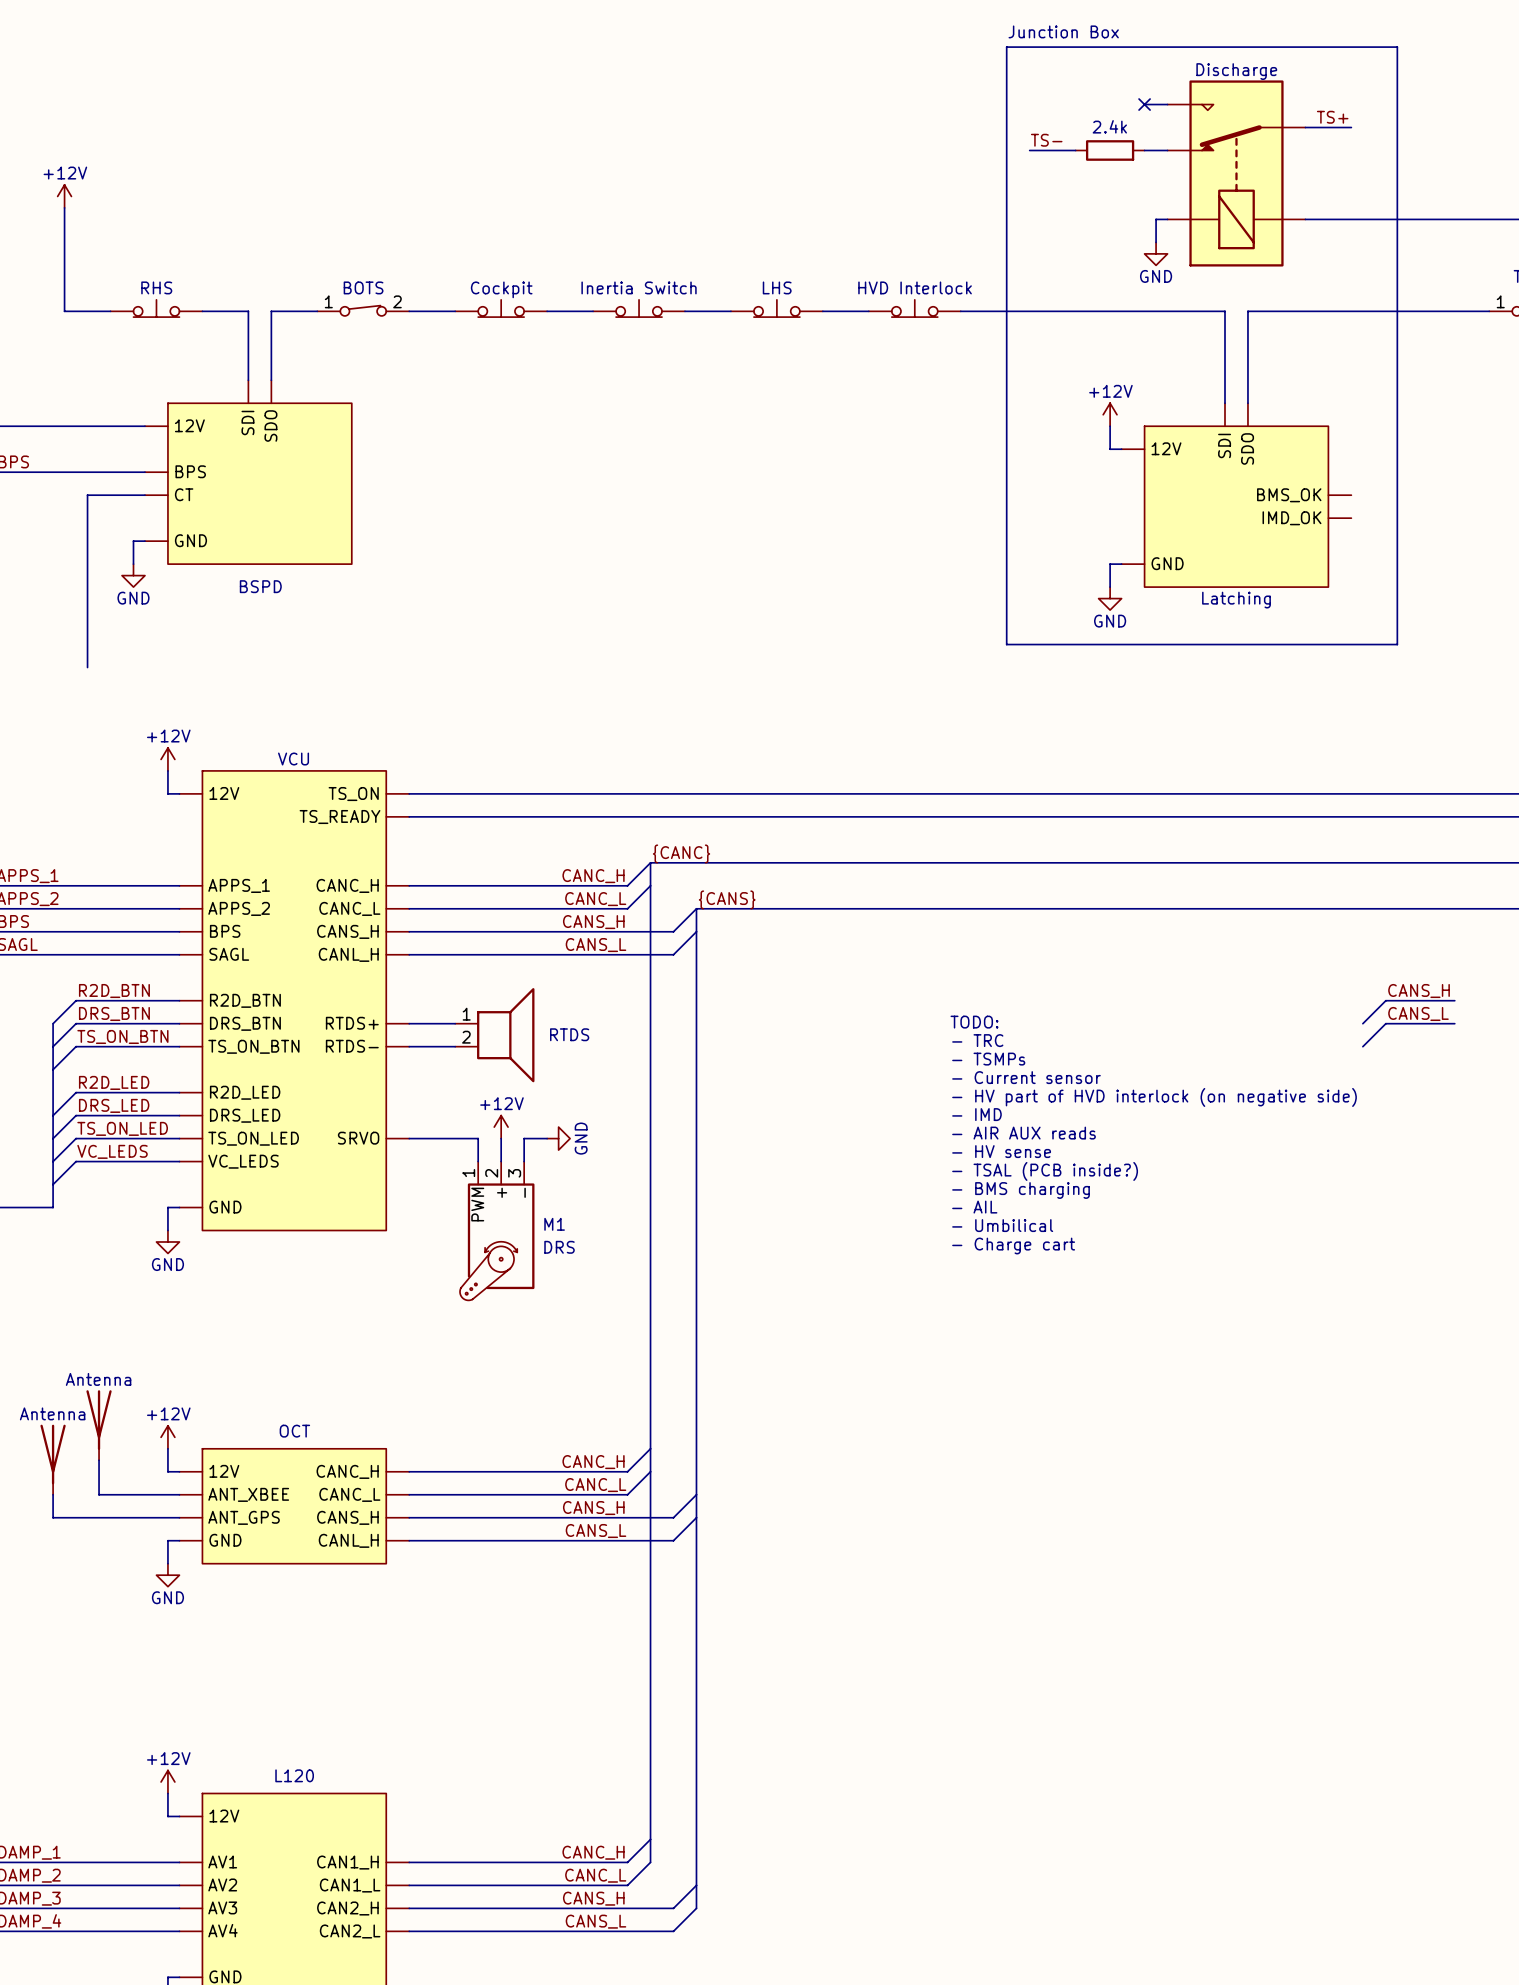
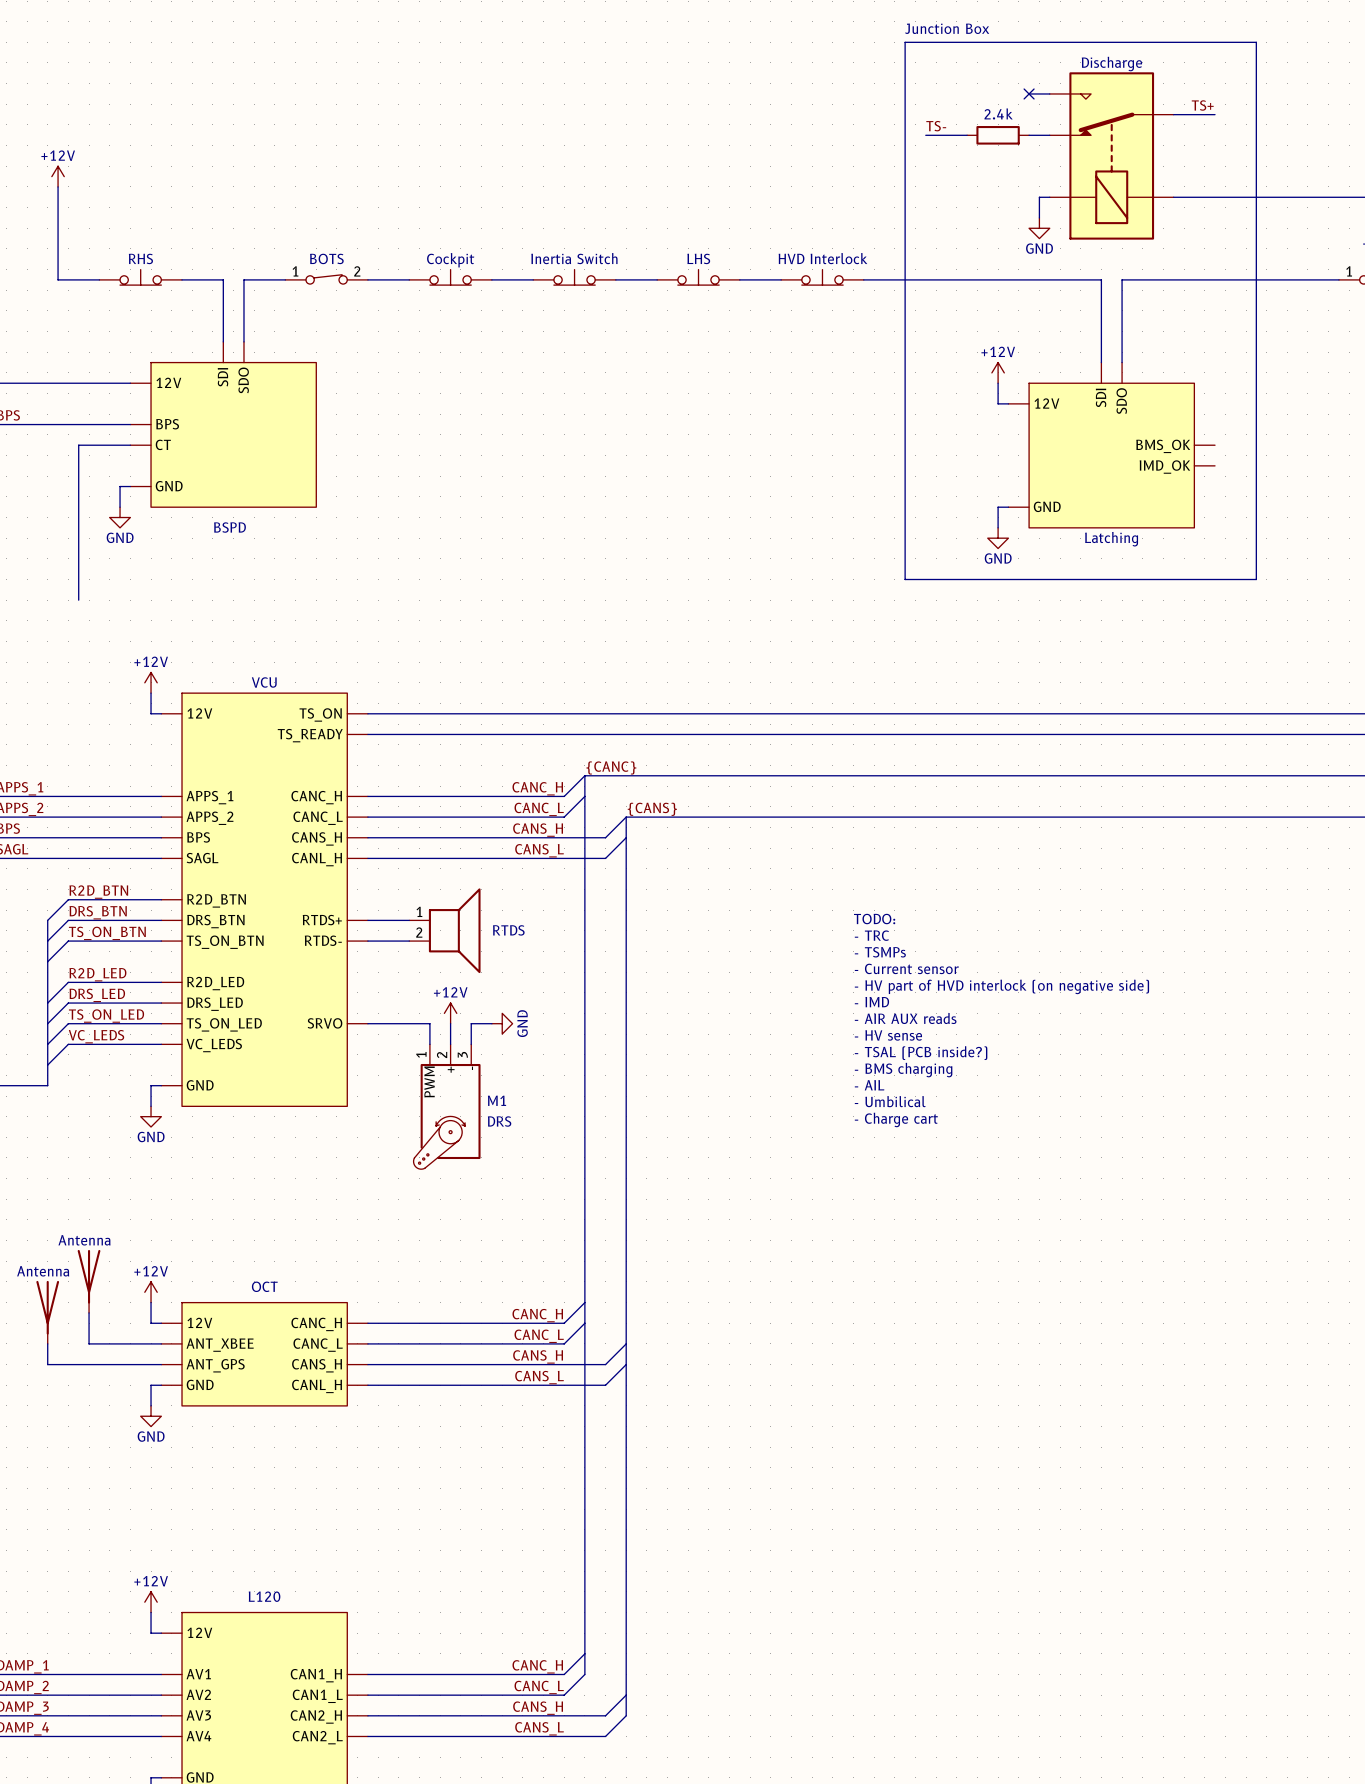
label: CANS_H (1419, 991) -> none
wire: (1454, 1000) (1385, 1000) (1362, 1023) -> none
label: CANS_L (1418, 1013) -> none
wire: (1454, 1023) (1385, 1023) (1362, 1046) -> none

